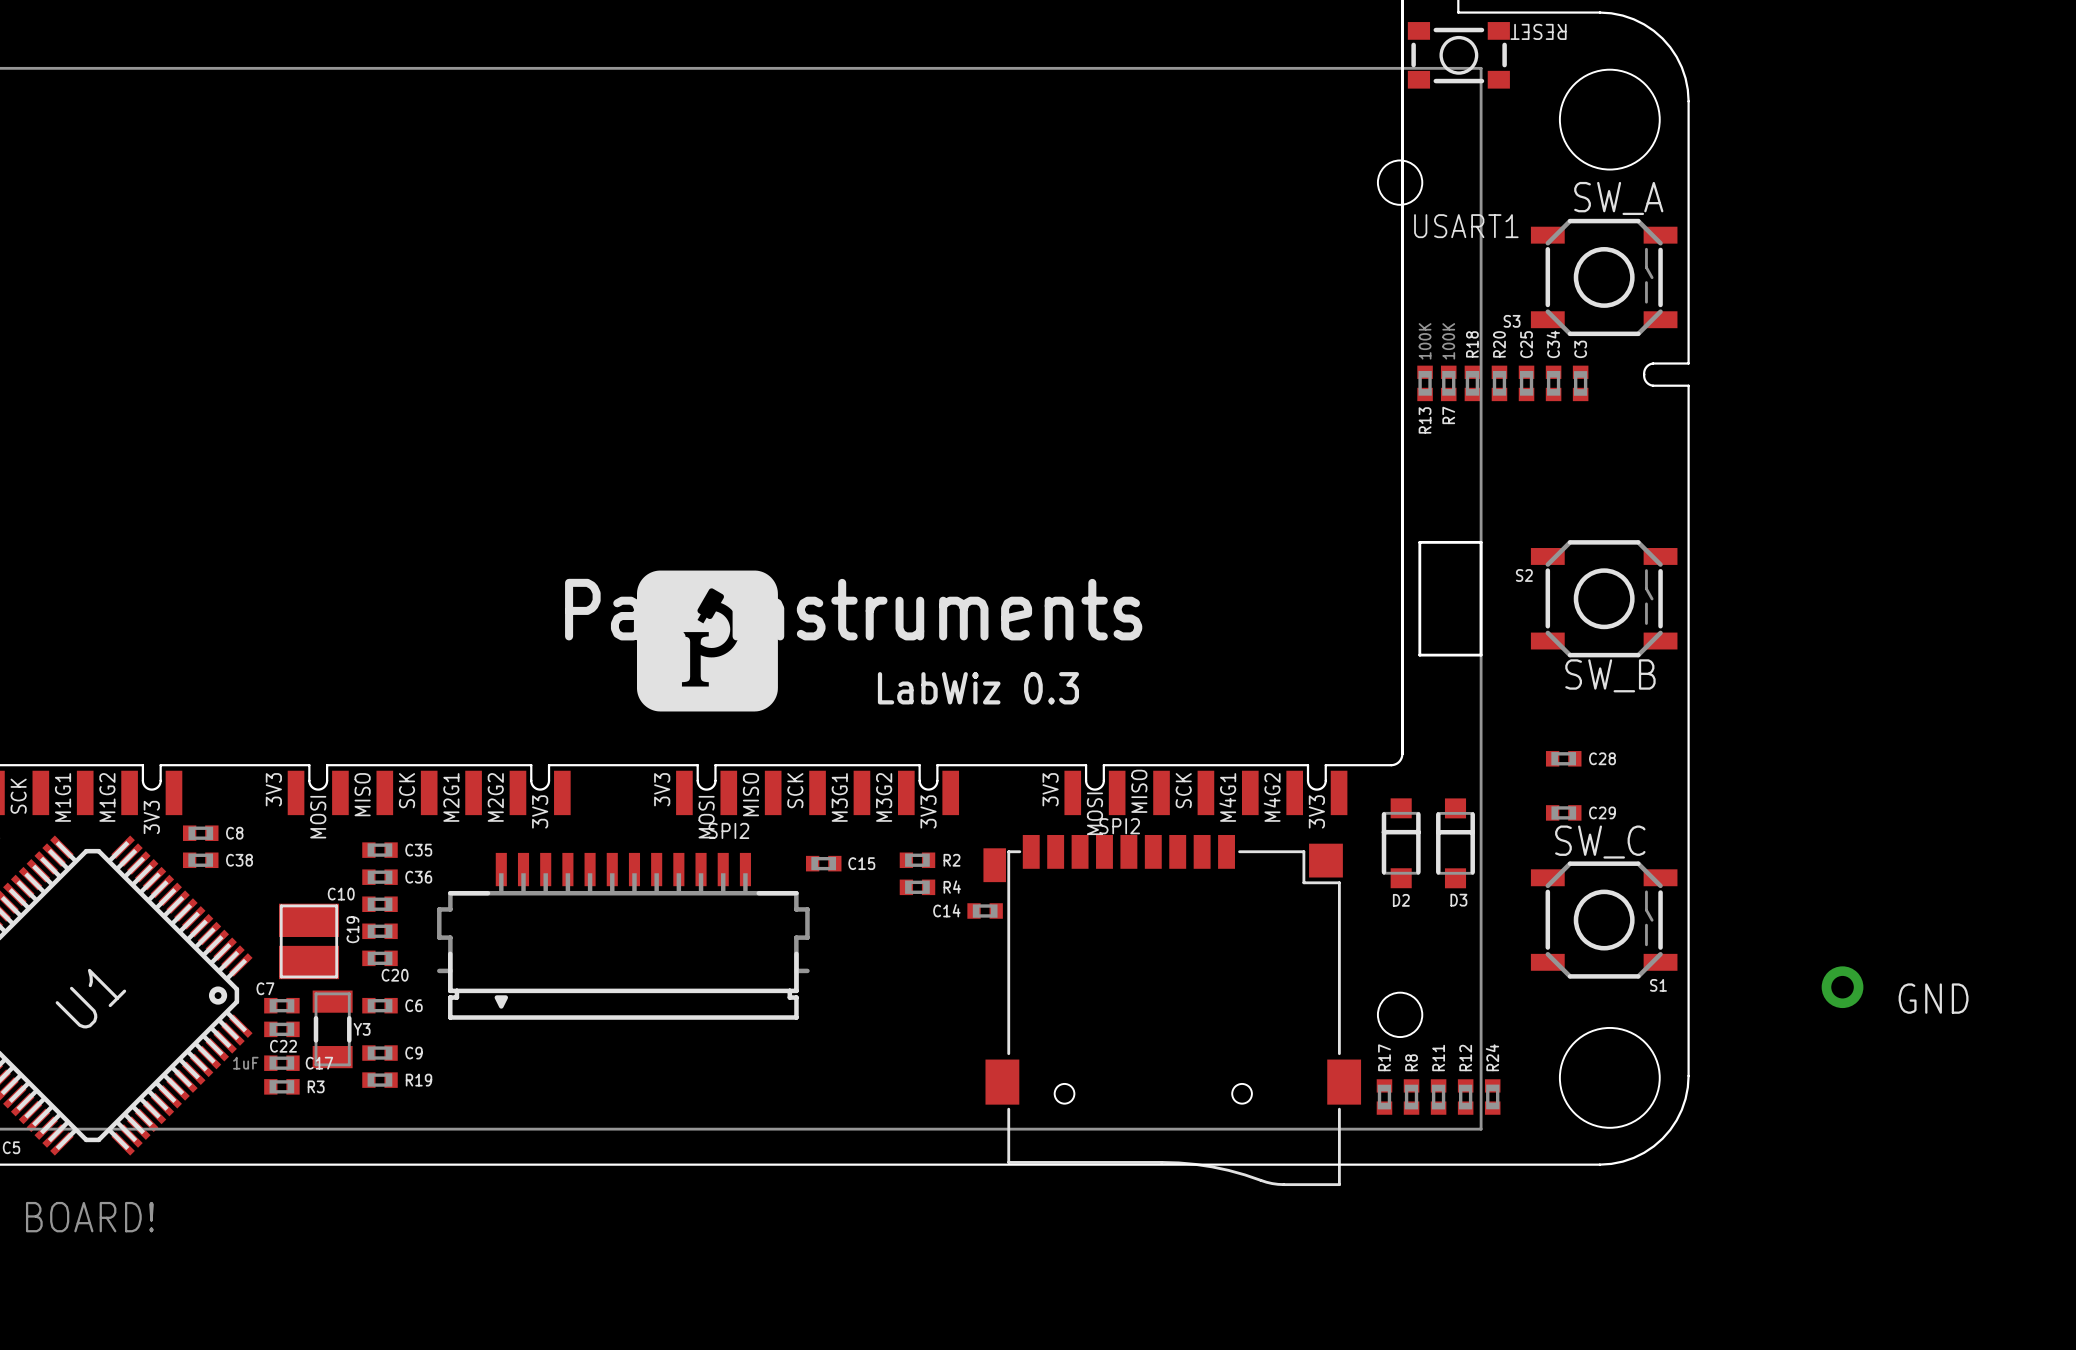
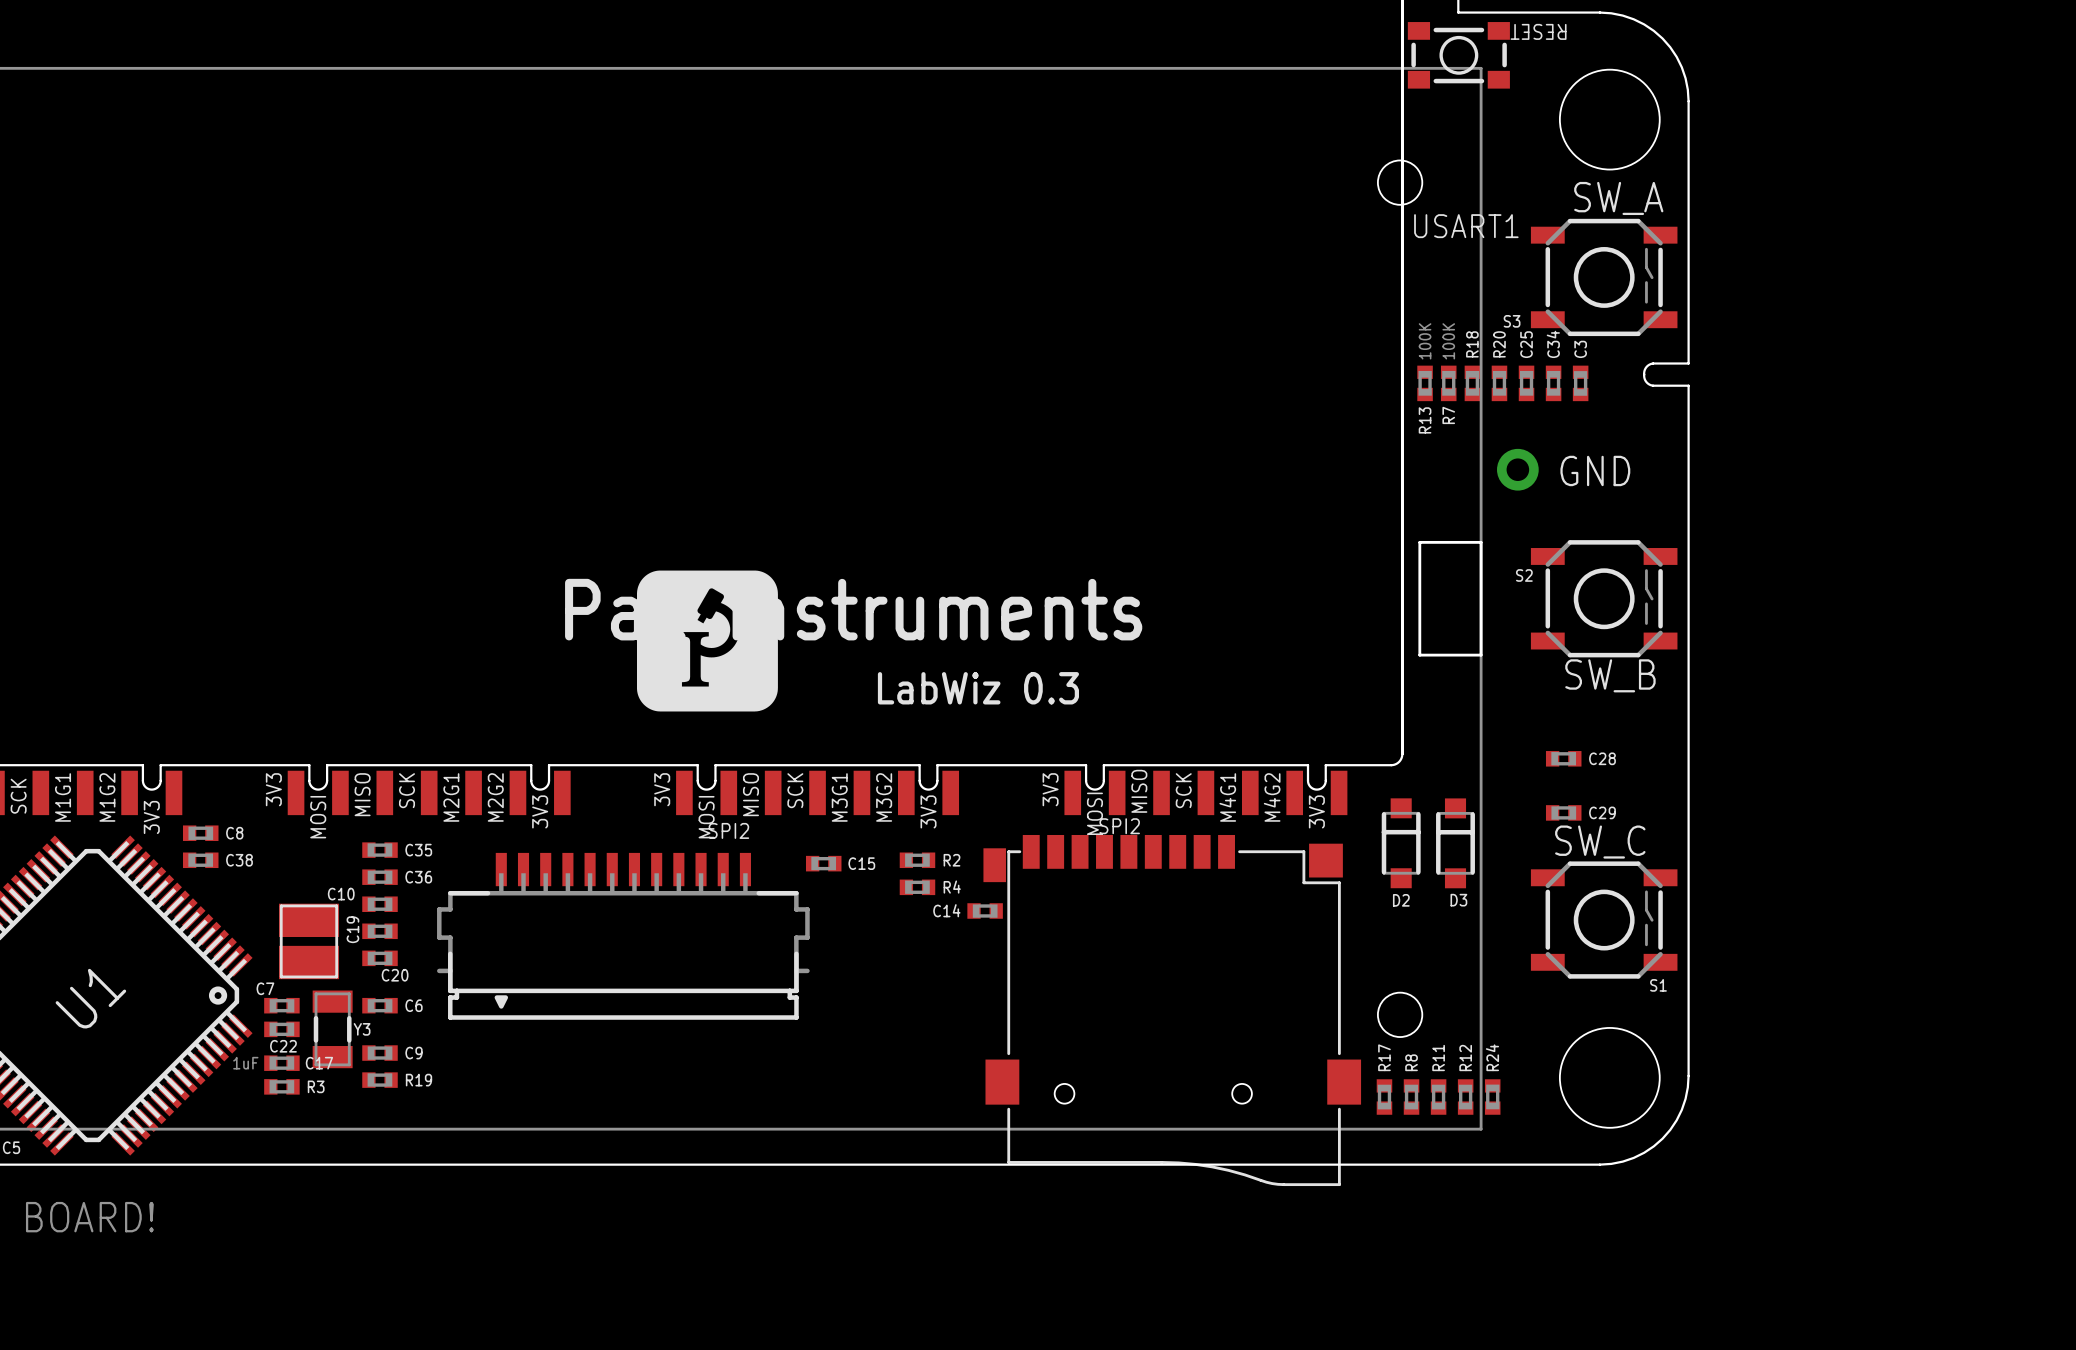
part: none -> (1517, 469)
text: none -> GND (1595, 470)
part: (1842, 987) -> none
text: GND (1933, 998) -> none

